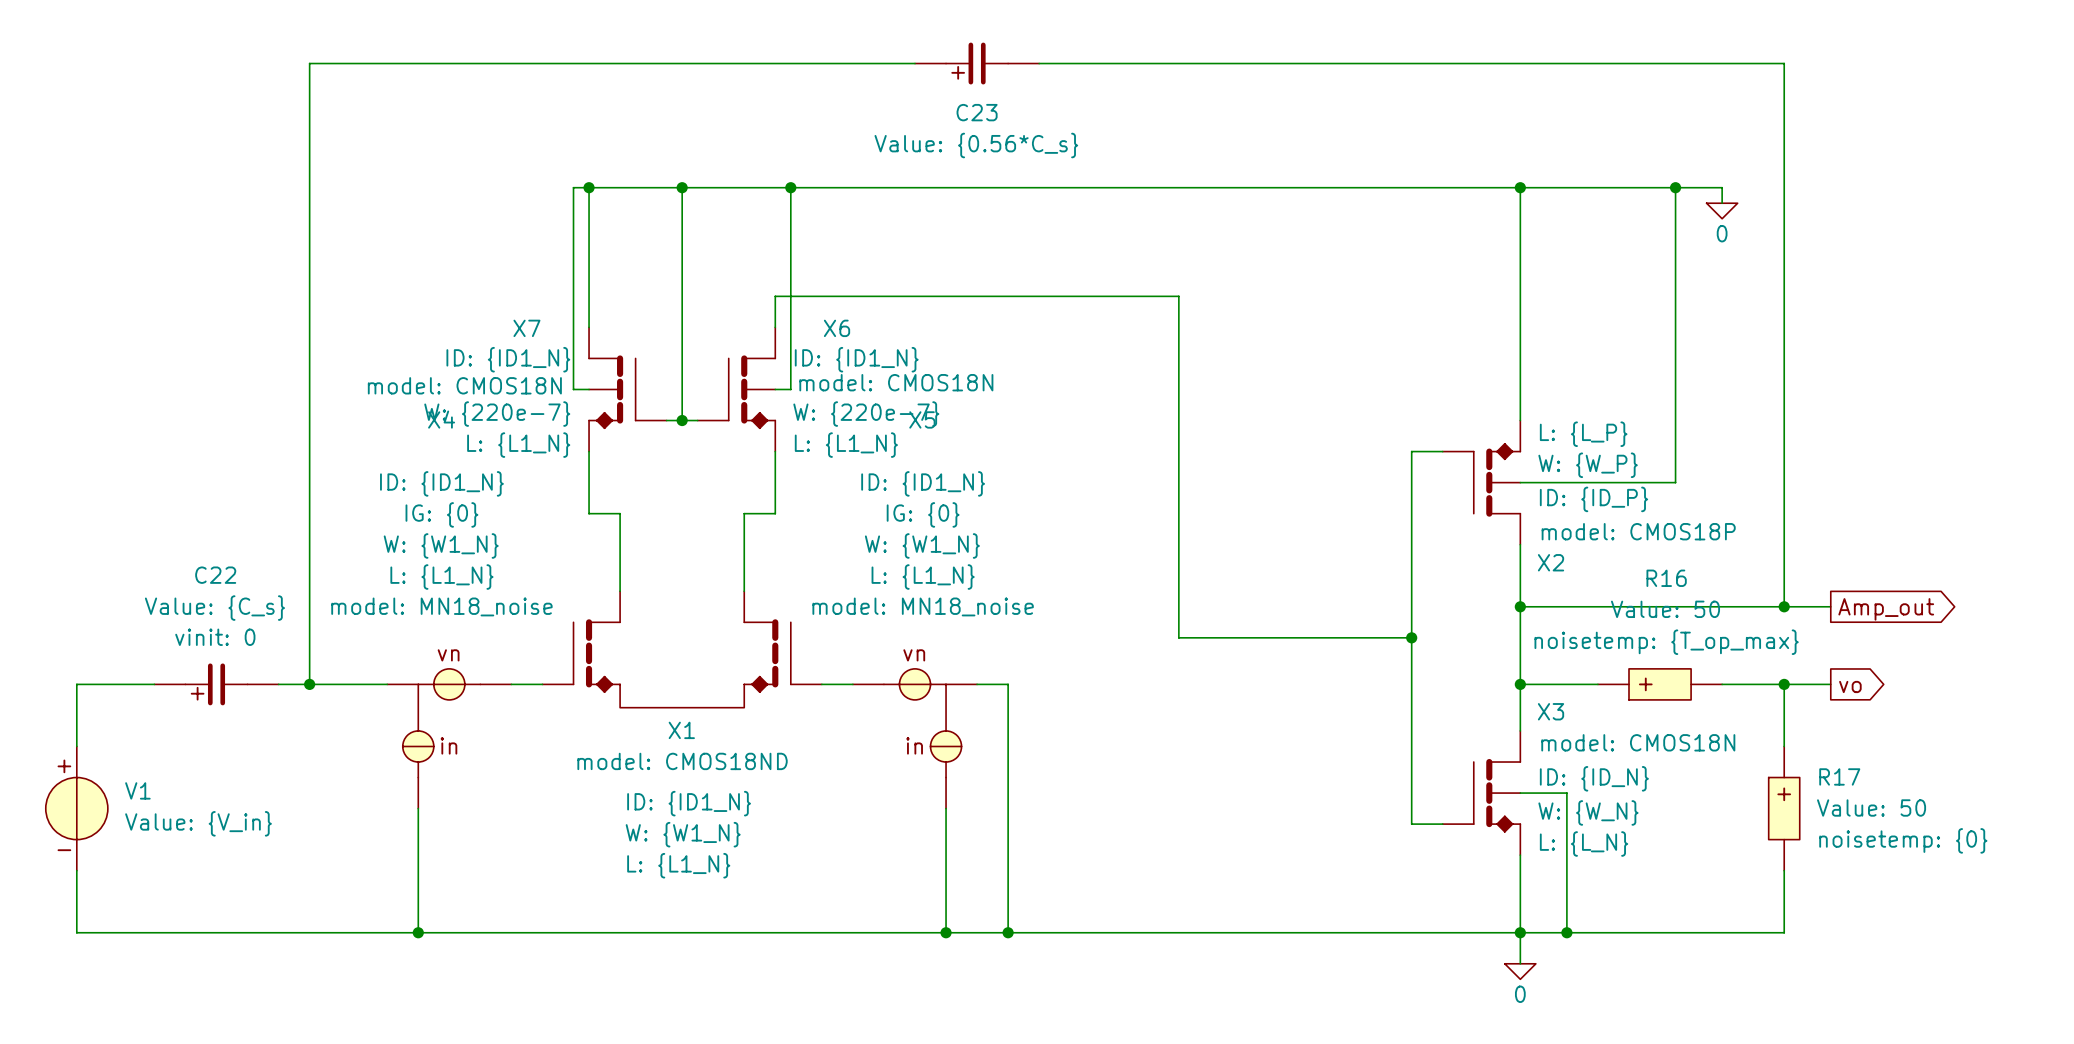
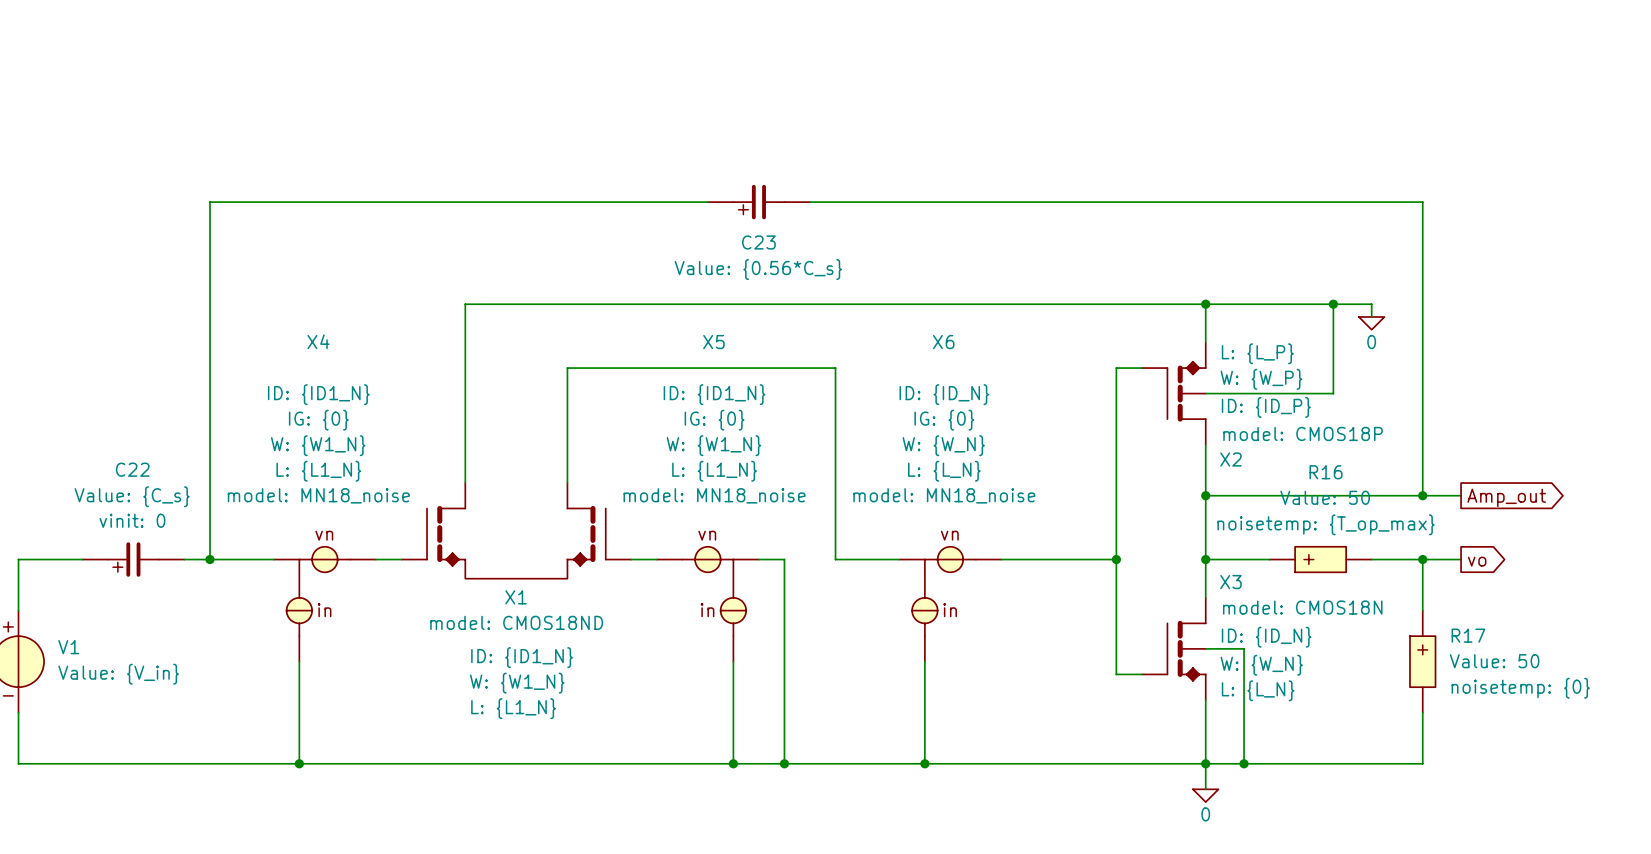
wire: (914, 63) (309, 63) (309, 249) -> (707, 202) (210, 202)
C23 position: (977, 63) -> (758, 202)
wire: (1039, 63) (1784, 63) (1784, 249) -> (809, 202) (1422, 202)
wire: (589, 187) (589, 327) -> none
junction: (589, 187) -> none
wire: (682, 187) (682, 420) -> none
junction: (682, 187) -> none
wire: (790, 187) (790, 389) (775, 389) -> none
junction: (790, 187) -> none
wire: (1520, 187) (1520, 373) -> none
junction: (1520, 187) -> none
wire: (1675, 187) (1675, 373) -> none
junction: (1675, 187) -> none
wire: (1722, 203) (1722, 187) (573, 187) (573, 389) (589, 389) -> none
power symbol position: 0 (1722, 210) -> 0 (1371, 323)
X6 symbol: [697, 327, 776, 452] -> [899, 546, 1002, 662]
wire: (775, 327) (775, 296) (1178, 296) (1178, 637) (1411, 637) -> none
X6 name position: X6 (837, 328) -> X6 (943, 342)
X6 text: ID: {ID1_N} (856, 359) -> ID: {ID_N} (944, 394)
junction: none -> (1205, 304)
junction: none -> (1333, 304)
X6 text: model: CMOS18N (896, 382) -> model: MN18_noise (944, 495)
X7: (627, 389) -> none
X6 text: W: {220e-7} (866, 414) -> W: {W_N} (943, 445)
wire: (666, 420) (697, 420) -> none
junction: (682, 420) -> none
X6 text: L: {L1_N} (846, 445) -> L: {L_N} (944, 471)
wire: (589, 451) (589, 513) (620, 513) -> (1371, 316) (1371, 304) (465, 304) (465, 419)
wire: (775, 451) (775, 513) (744, 513) -> (899, 559) (835, 559) (835, 368) (567, 368) (567, 419)
X6 text: none -> IG: {0} (944, 420)
junction position: (1411, 637) -> (1116, 559)
wire: none -> (1001, 559) (1116, 559)
wire: none -> (924, 661) (924, 763)
junction: none -> (924, 763)

